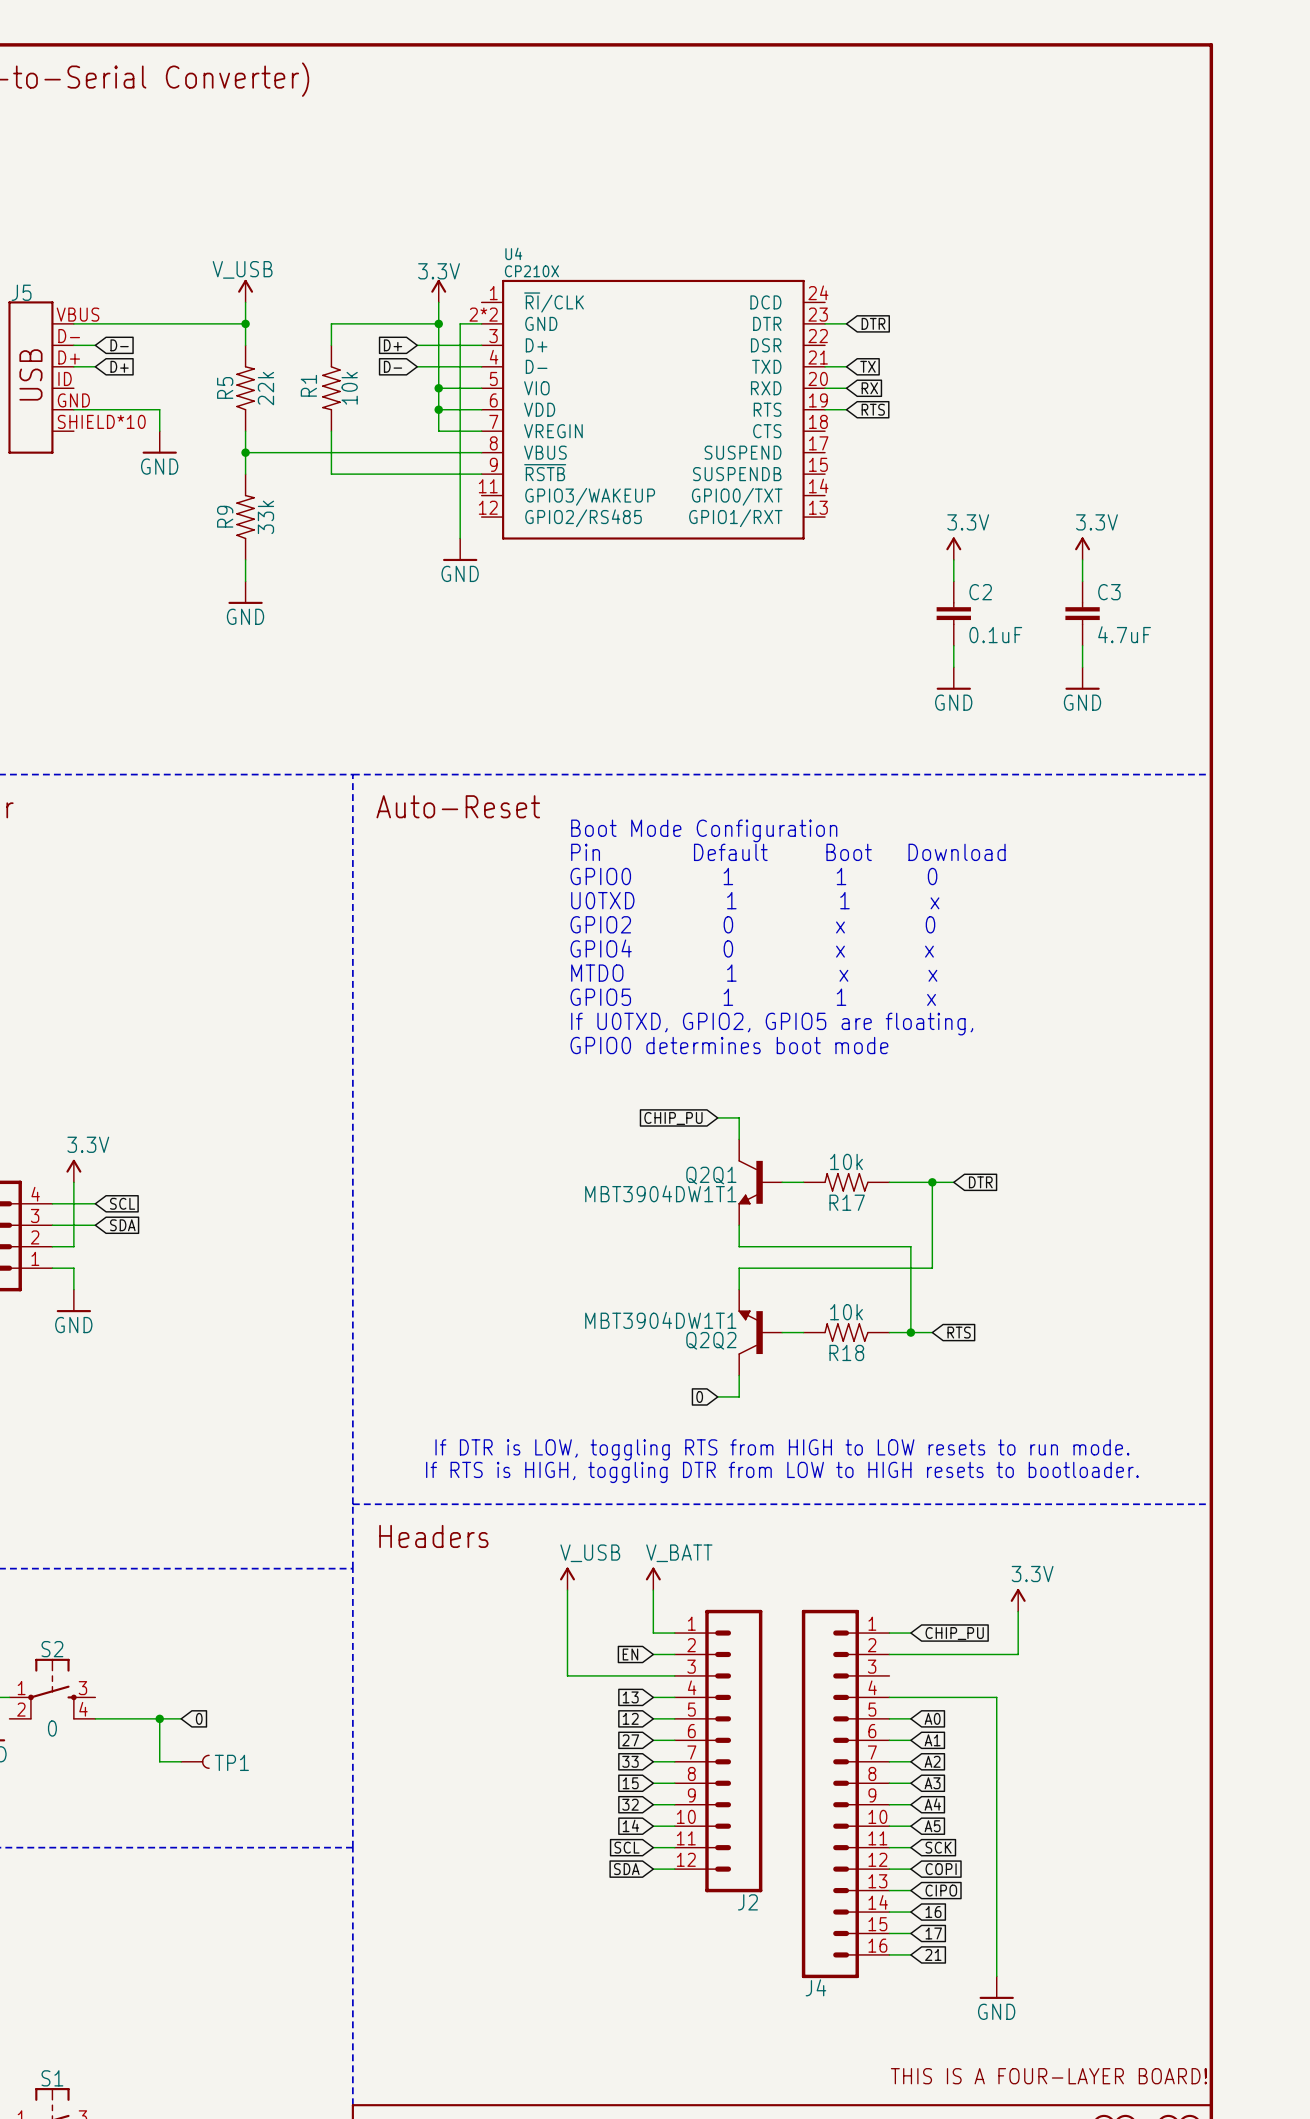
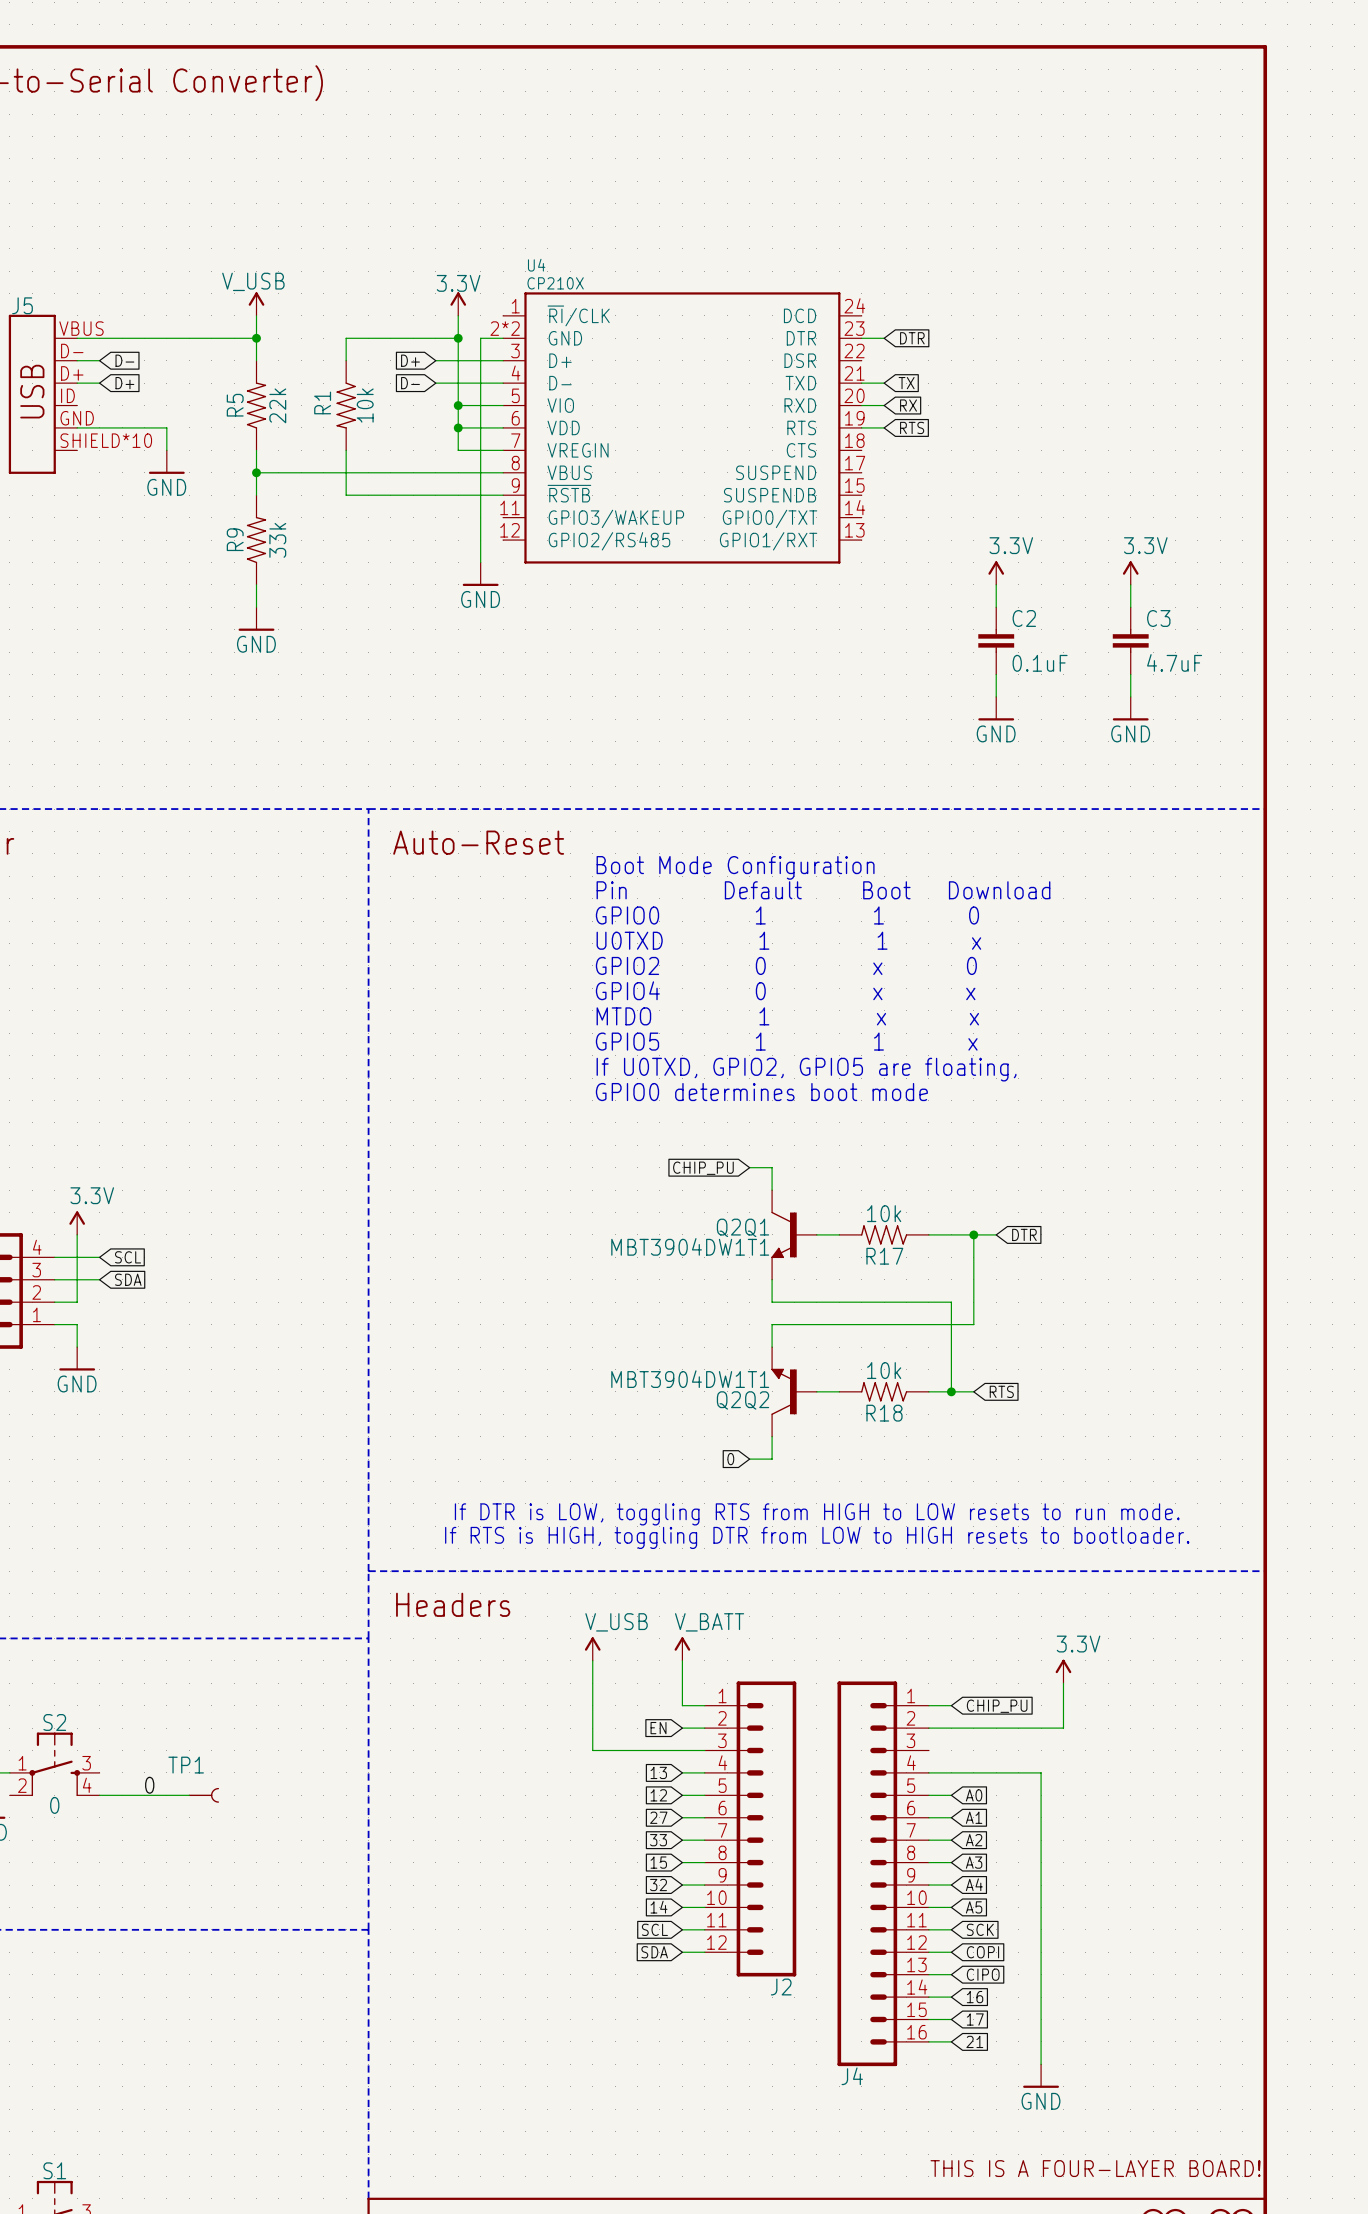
label: none -> 0 (149, 1785)
wire: (159, 1718) (159, 1761) (181, 1761) -> none
junction: (159, 1718) -> none
global label: 0 (199, 1718) -> none
TP1 position: (195, 1761) -> (203, 1795)
TP1 name position: TP1 (231, 1762) -> TP1 (186, 1765)

